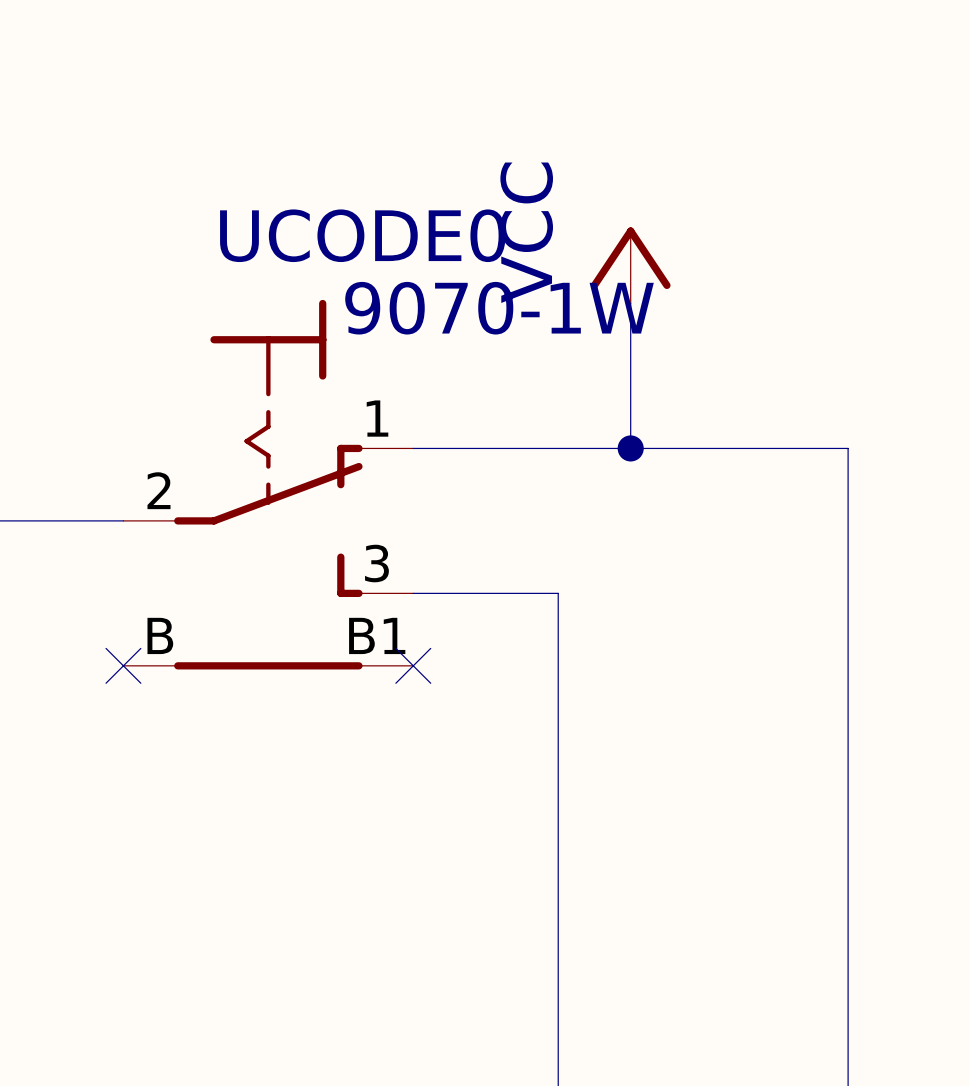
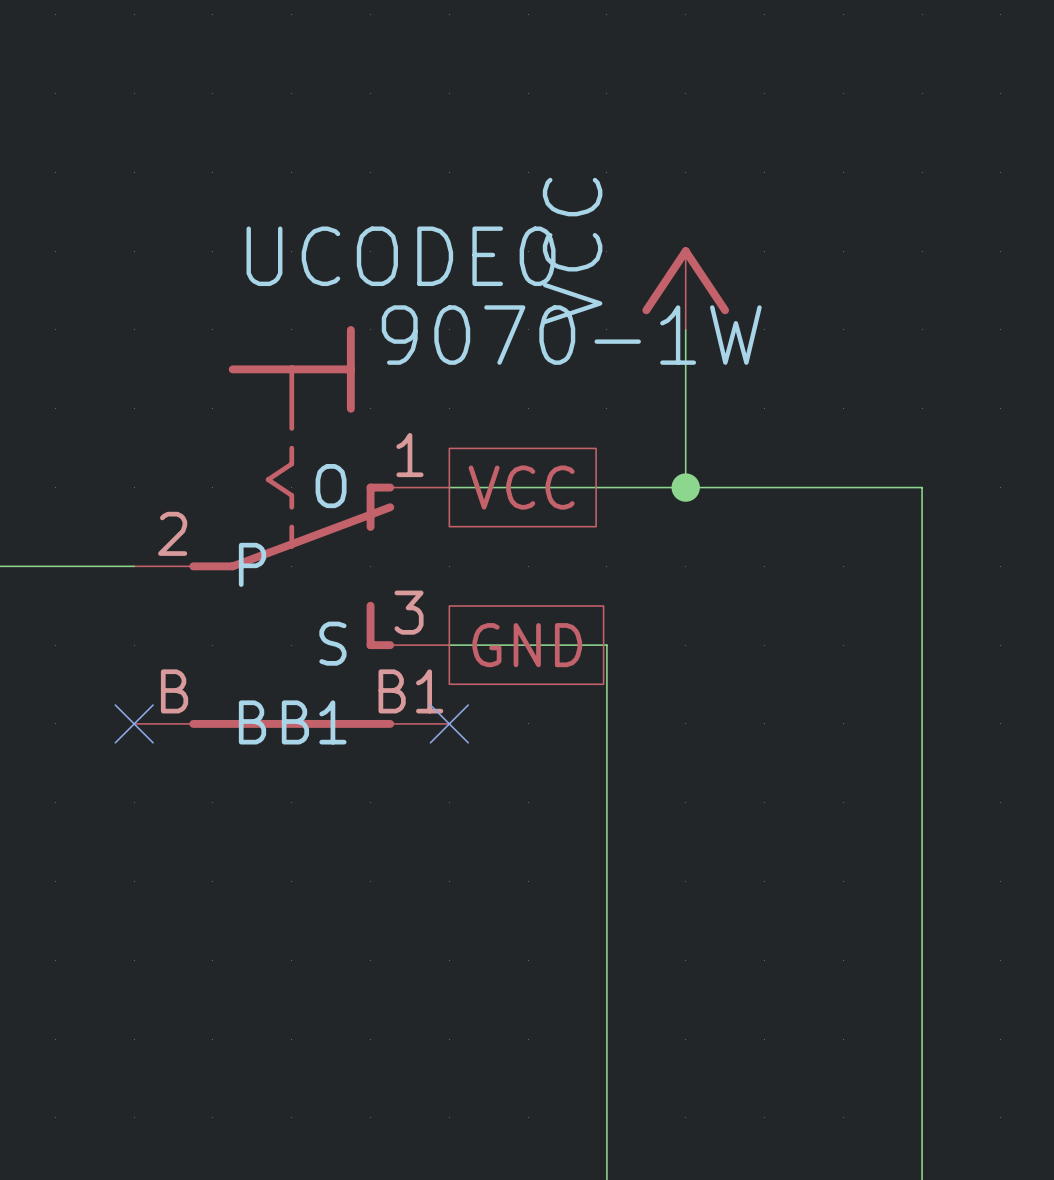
UCODE0 pin name: none -> O (331, 486)
global label: none -> VCC (521, 487)
UCODE0 pin name: none -> P (252, 564)
UCODE0 pin name: none -> S (332, 643)
global label: none -> GND (527, 645)
UCODE0 pin name: none -> B (252, 722)
UCODE0 pin name: none -> B1 (314, 722)

